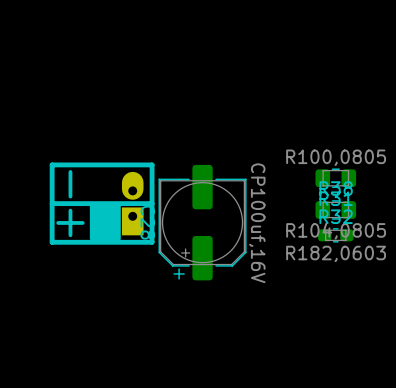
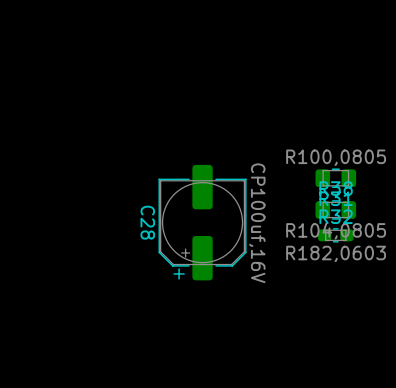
part: (102, 203) -> none

